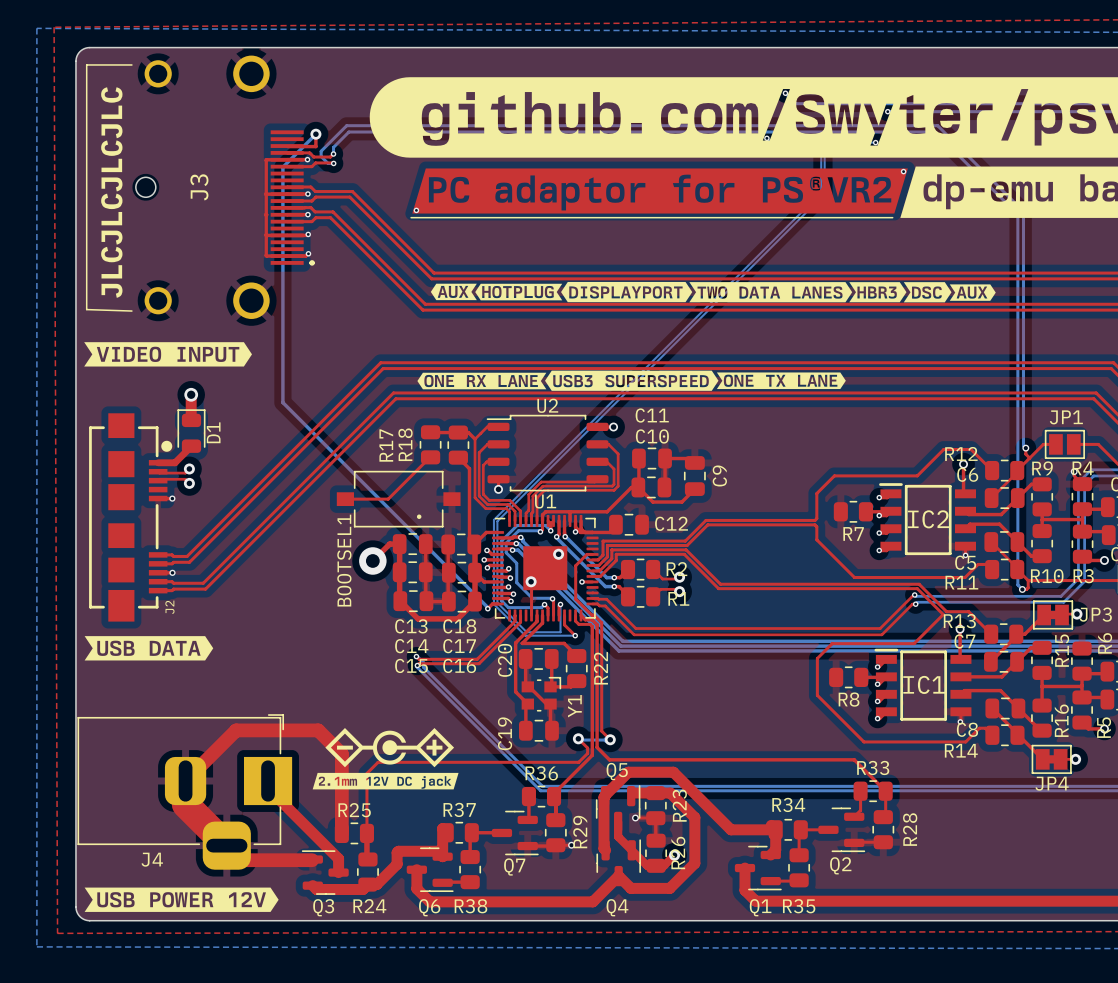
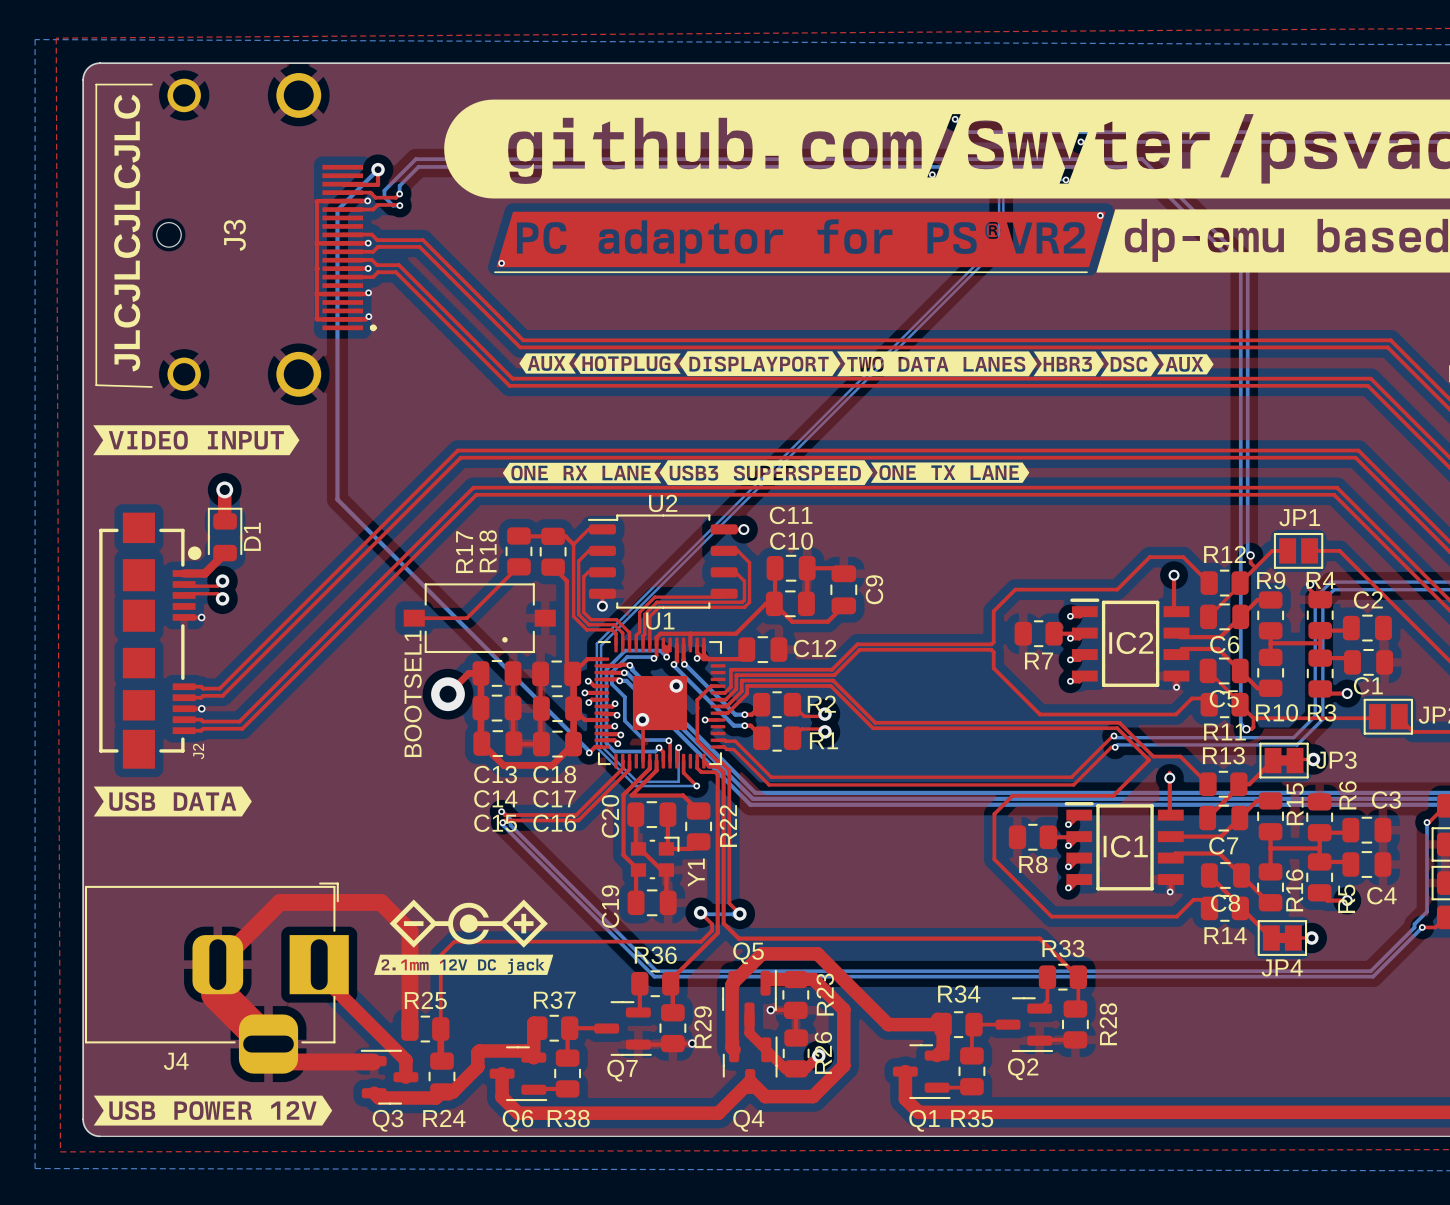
R12 name position: R12 (961, 453) -> R12 (1224, 554)
C6 name position: C6 (967, 474) -> C6 (1224, 644)
C5 name position: C5 (965, 562) -> C5 (1224, 698)
R11 name position: R11 (961, 582) -> R11 (1225, 732)
R13 name position: R13 (959, 621) -> R13 (1223, 755)
C7 name position: C7 (964, 641) -> C7 (1223, 845)
C8 name position: C8 (967, 729) -> C8 (1225, 903)
R14 name position: R14 (961, 750) -> R14 (1225, 935)

